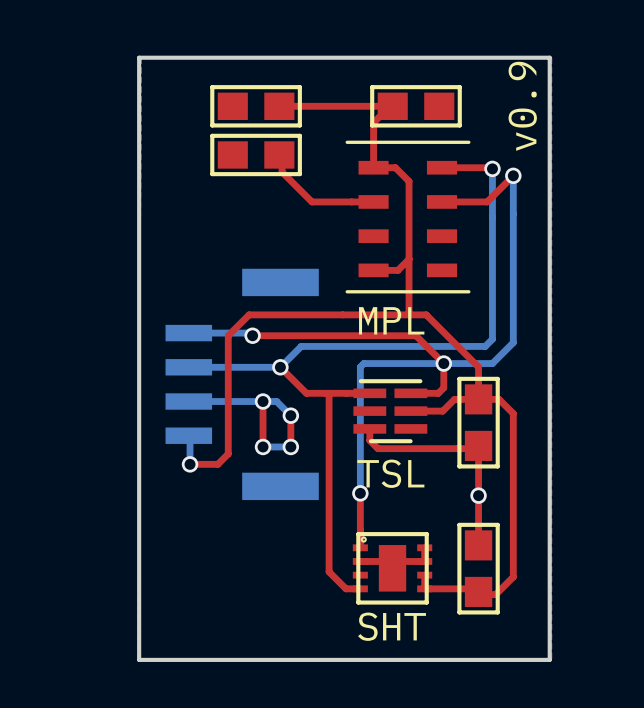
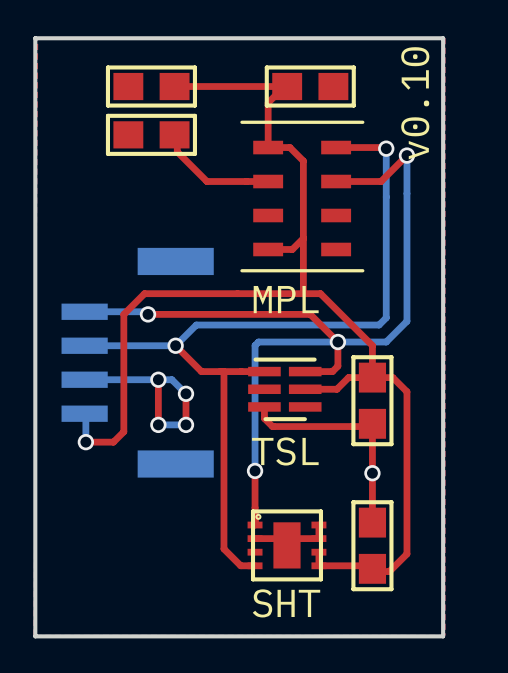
text: v0.9 (522, 106) -> v0.10 (415, 103)

